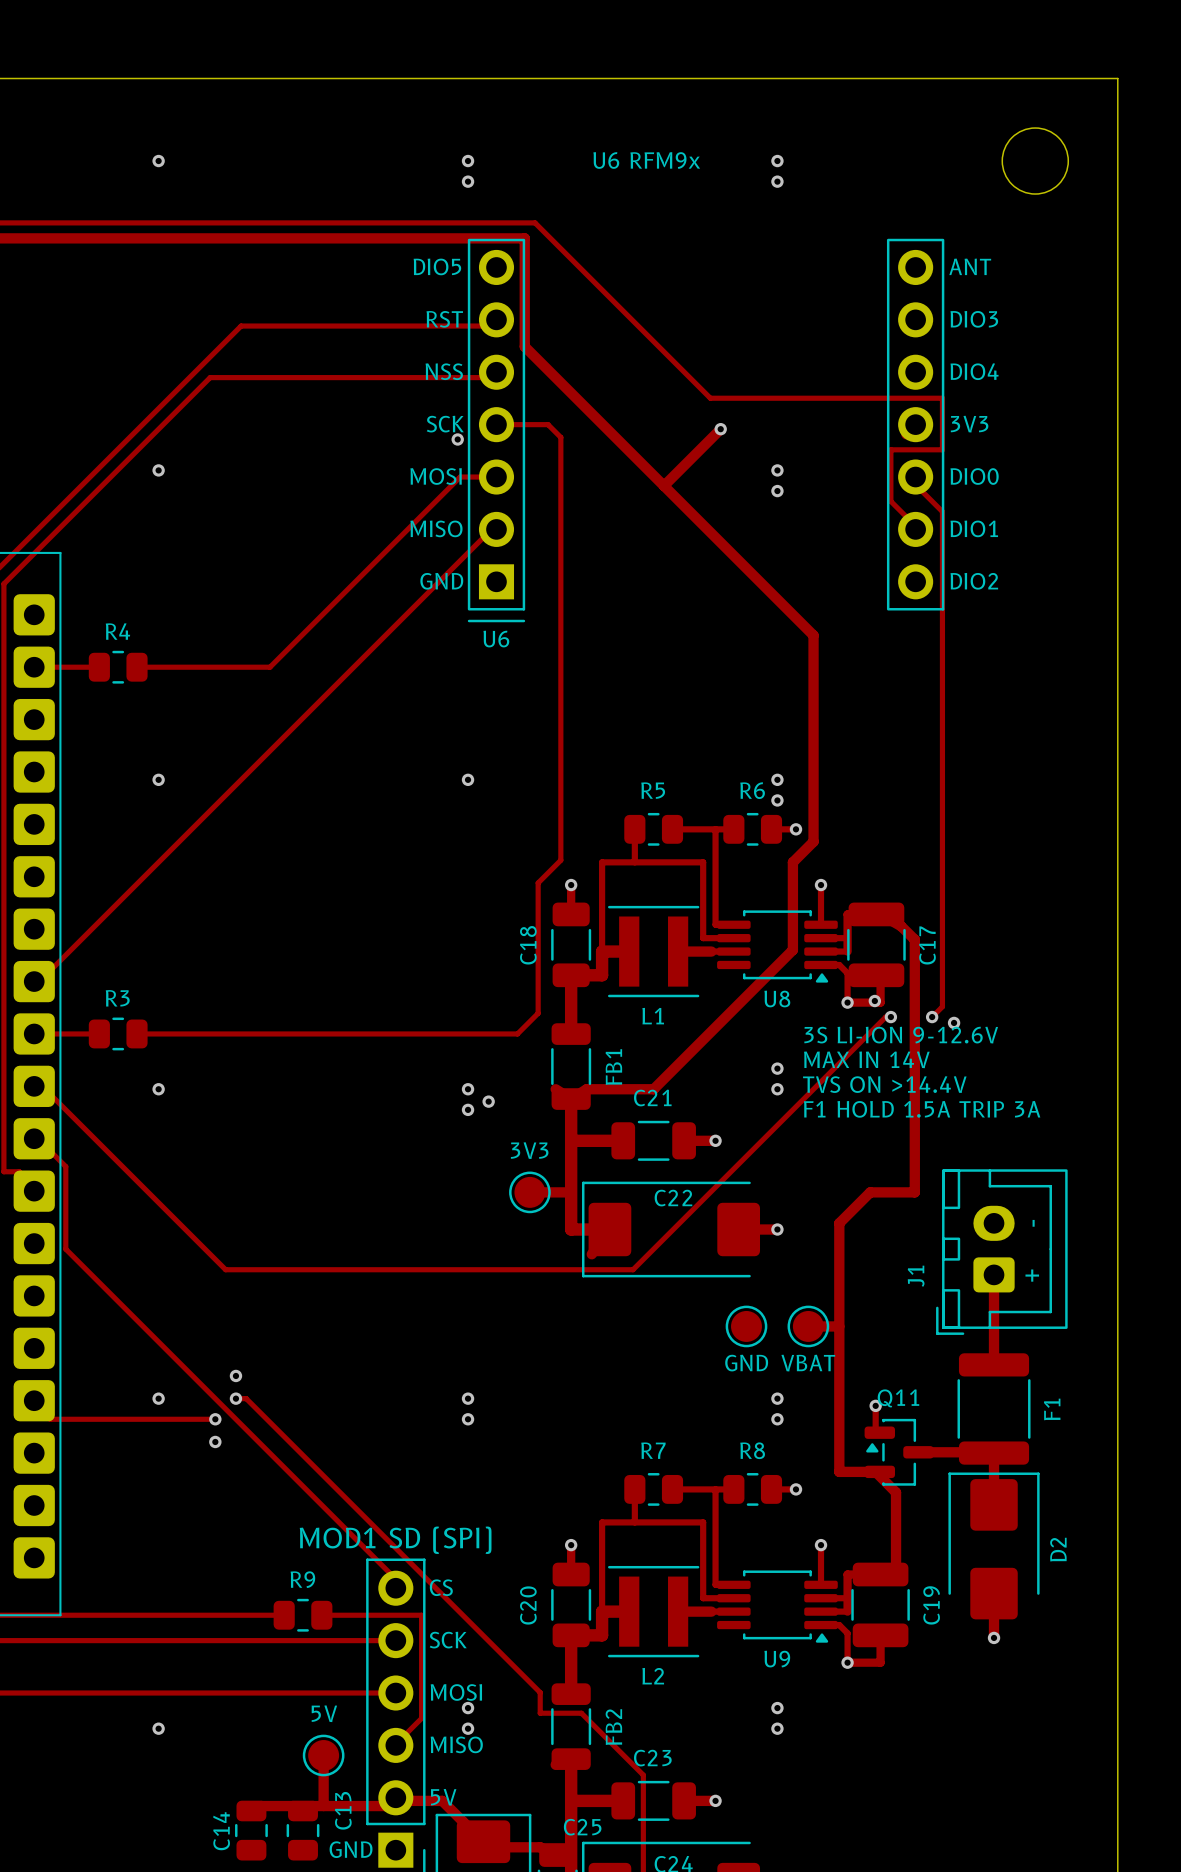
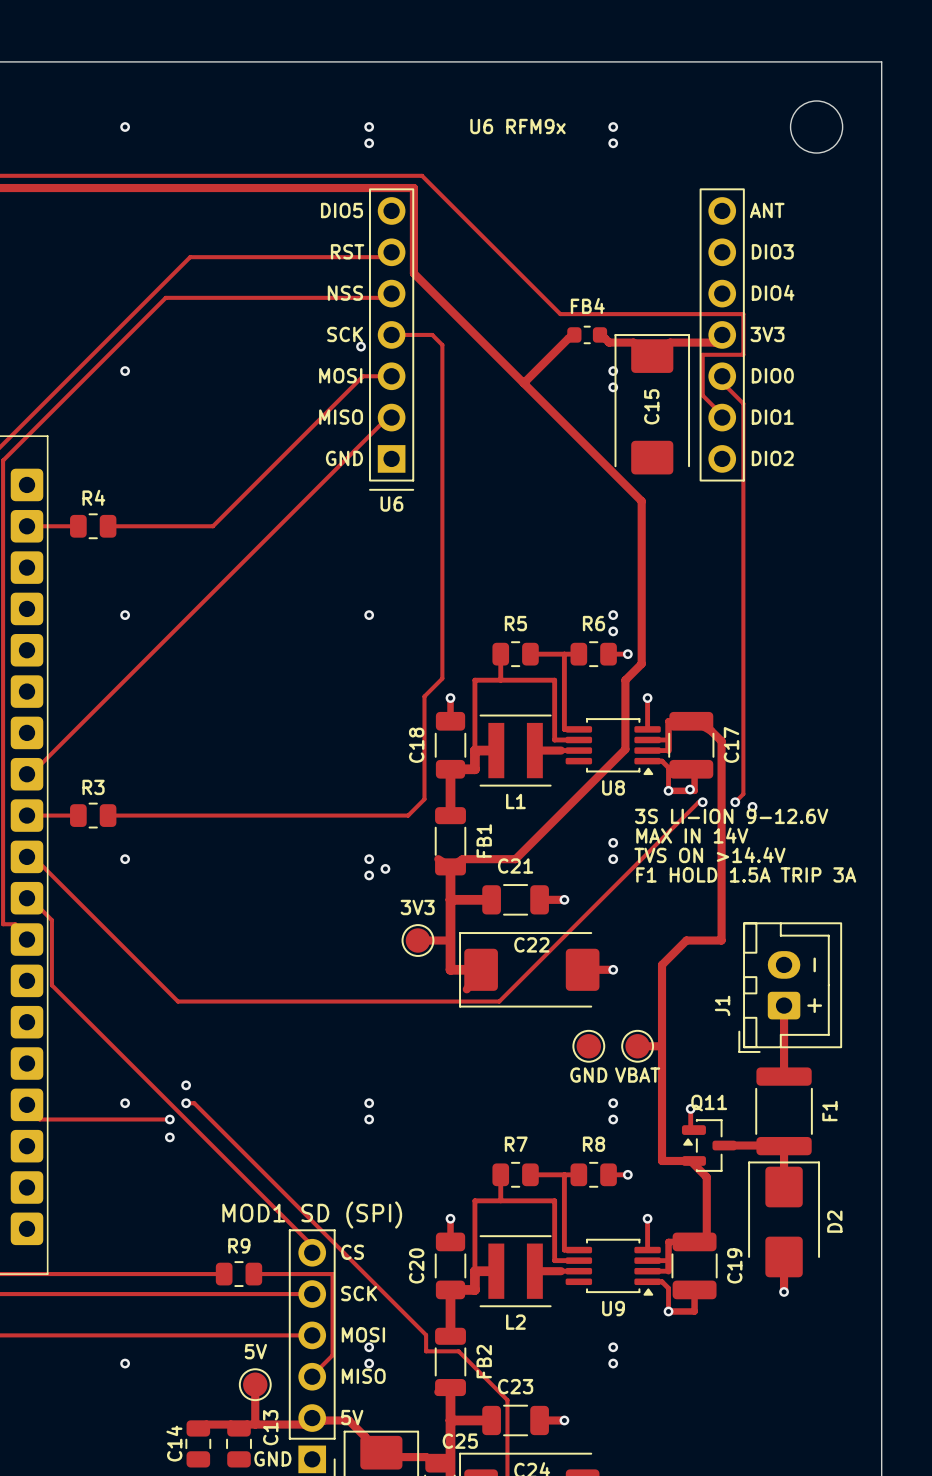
FB4: none -> (587, 334)
track: none -> (600, 334) (609, 342) (633, 342) (652, 356) (670, 342) (714, 342)
via: (720, 429) -> none
C15: none -> (652, 404)

